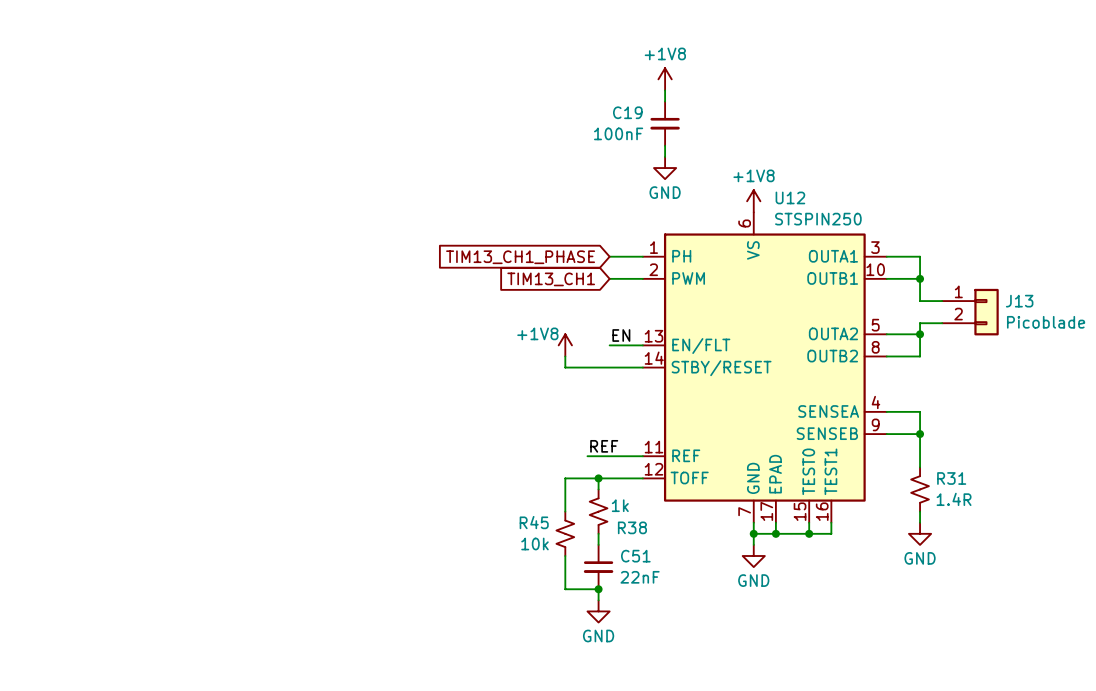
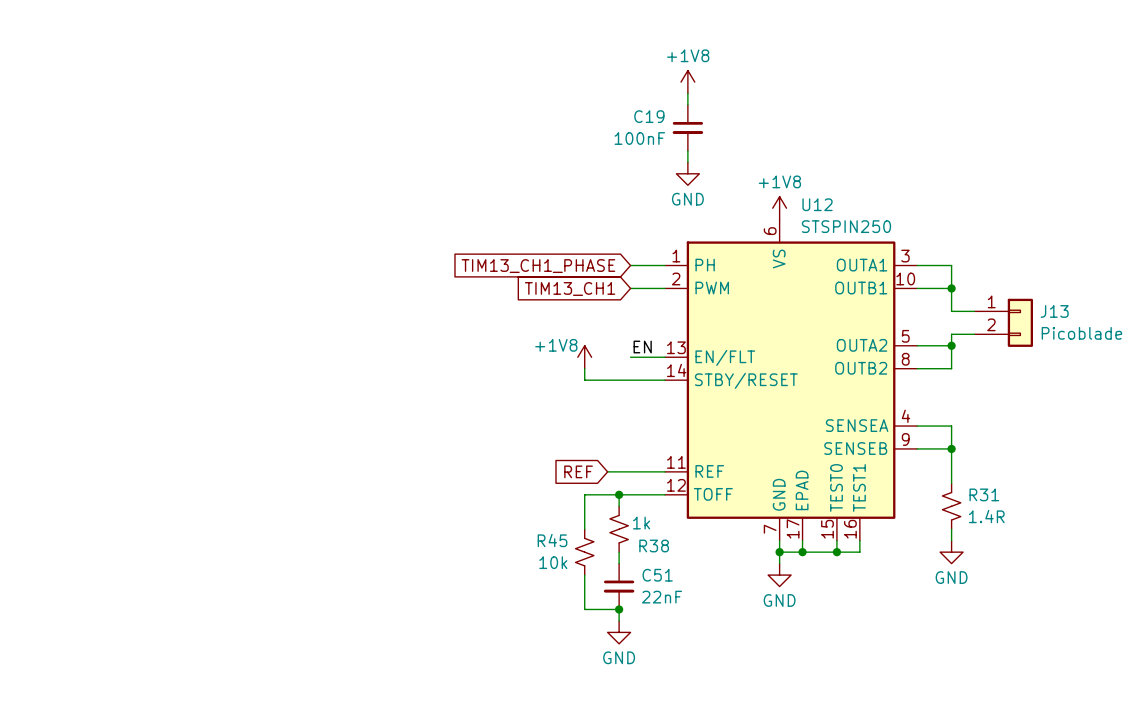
label: REF (604, 446) -> none
global label: none -> REF (578, 471)

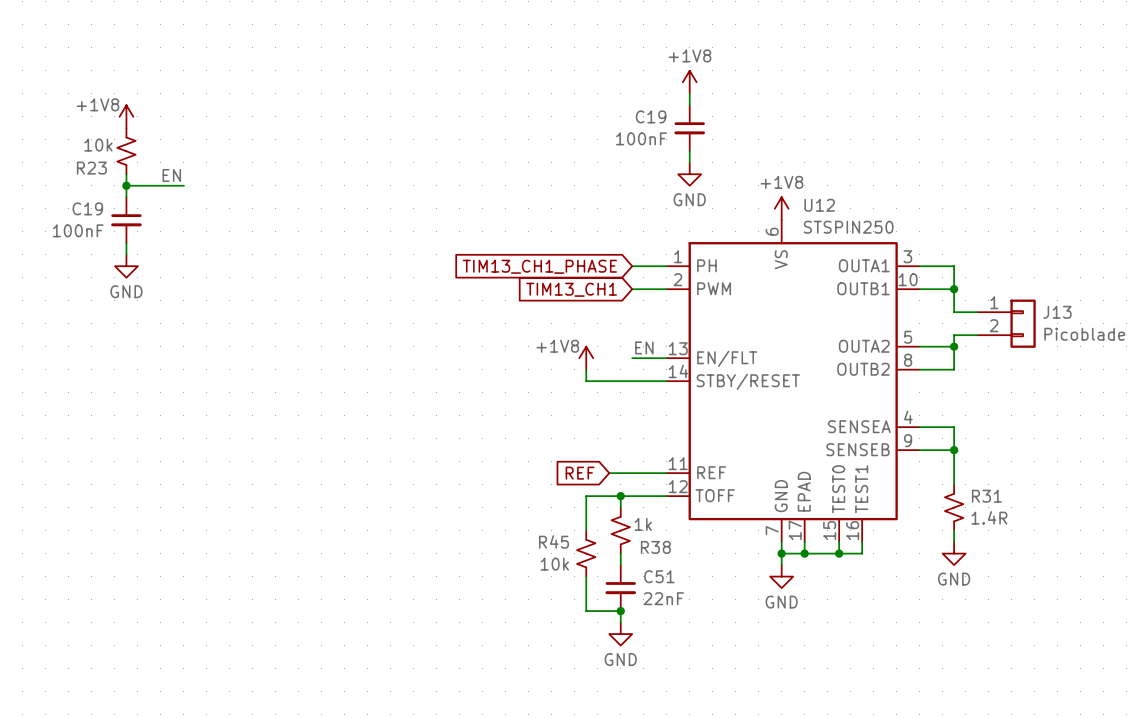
power symbol: none -> +1V8 (126, 116)
R23: none -> 10k (126, 151)
wire: none -> (126, 174) (126, 197)
label: none -> EN (171, 175)
wire: none -> (126, 185) (183, 185)
junction: none -> (126, 185)
C19: none -> 100nF (126, 220)
wire: none -> (126, 243) (126, 254)
power symbol: none -> GND (126, 266)

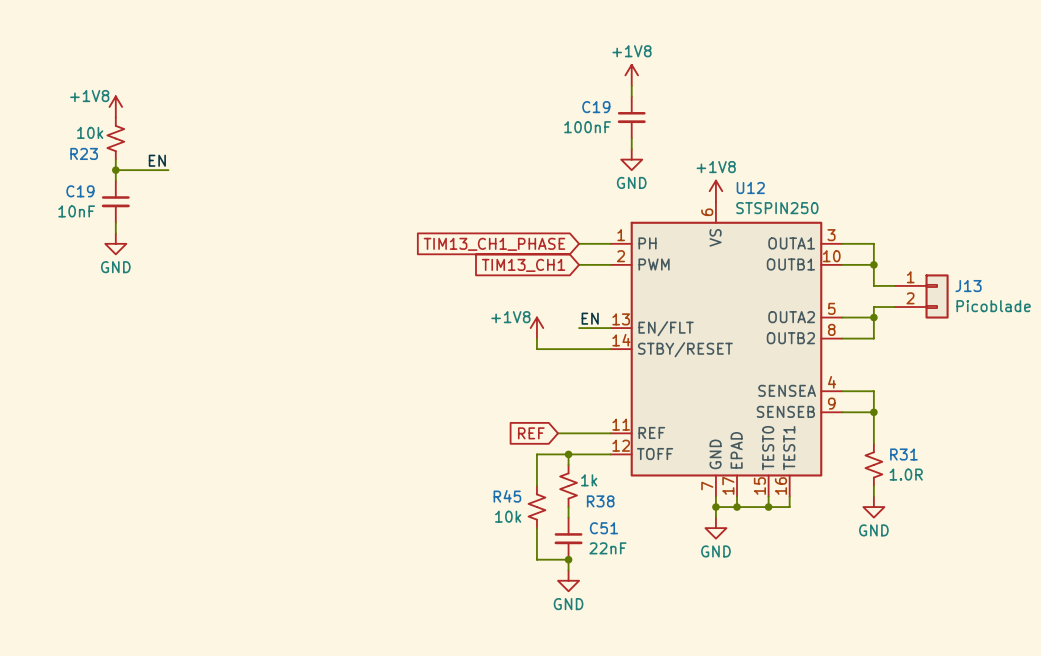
C19 value: 100nF (78, 230) -> 10nF (76, 211)
R31 value: 1.4R (989, 517) -> 1.0R (906, 474)

